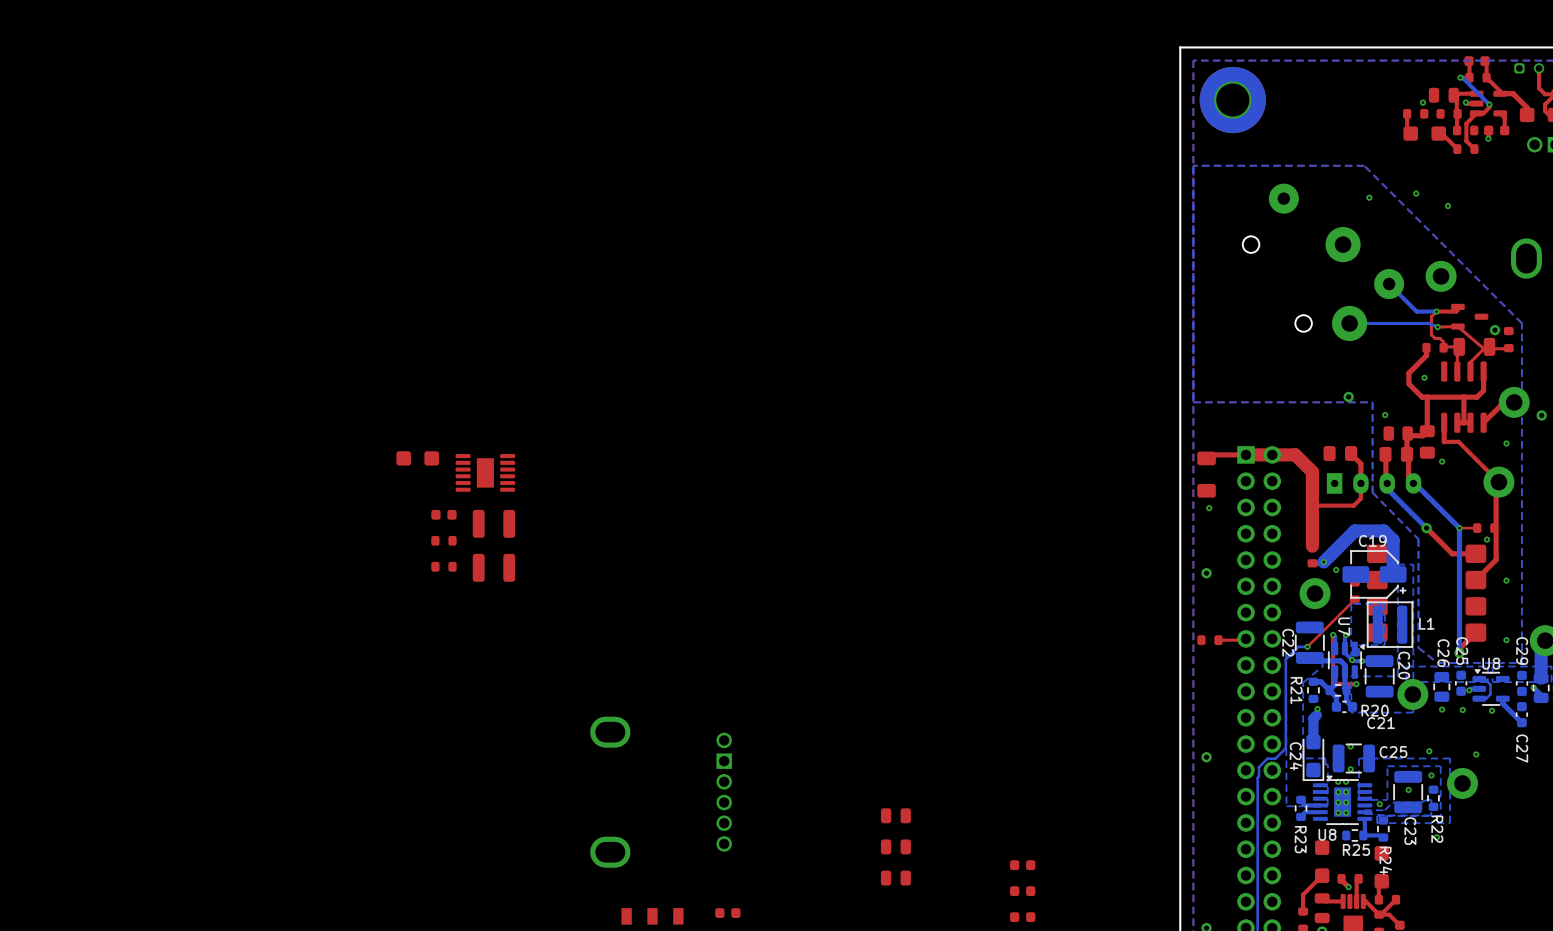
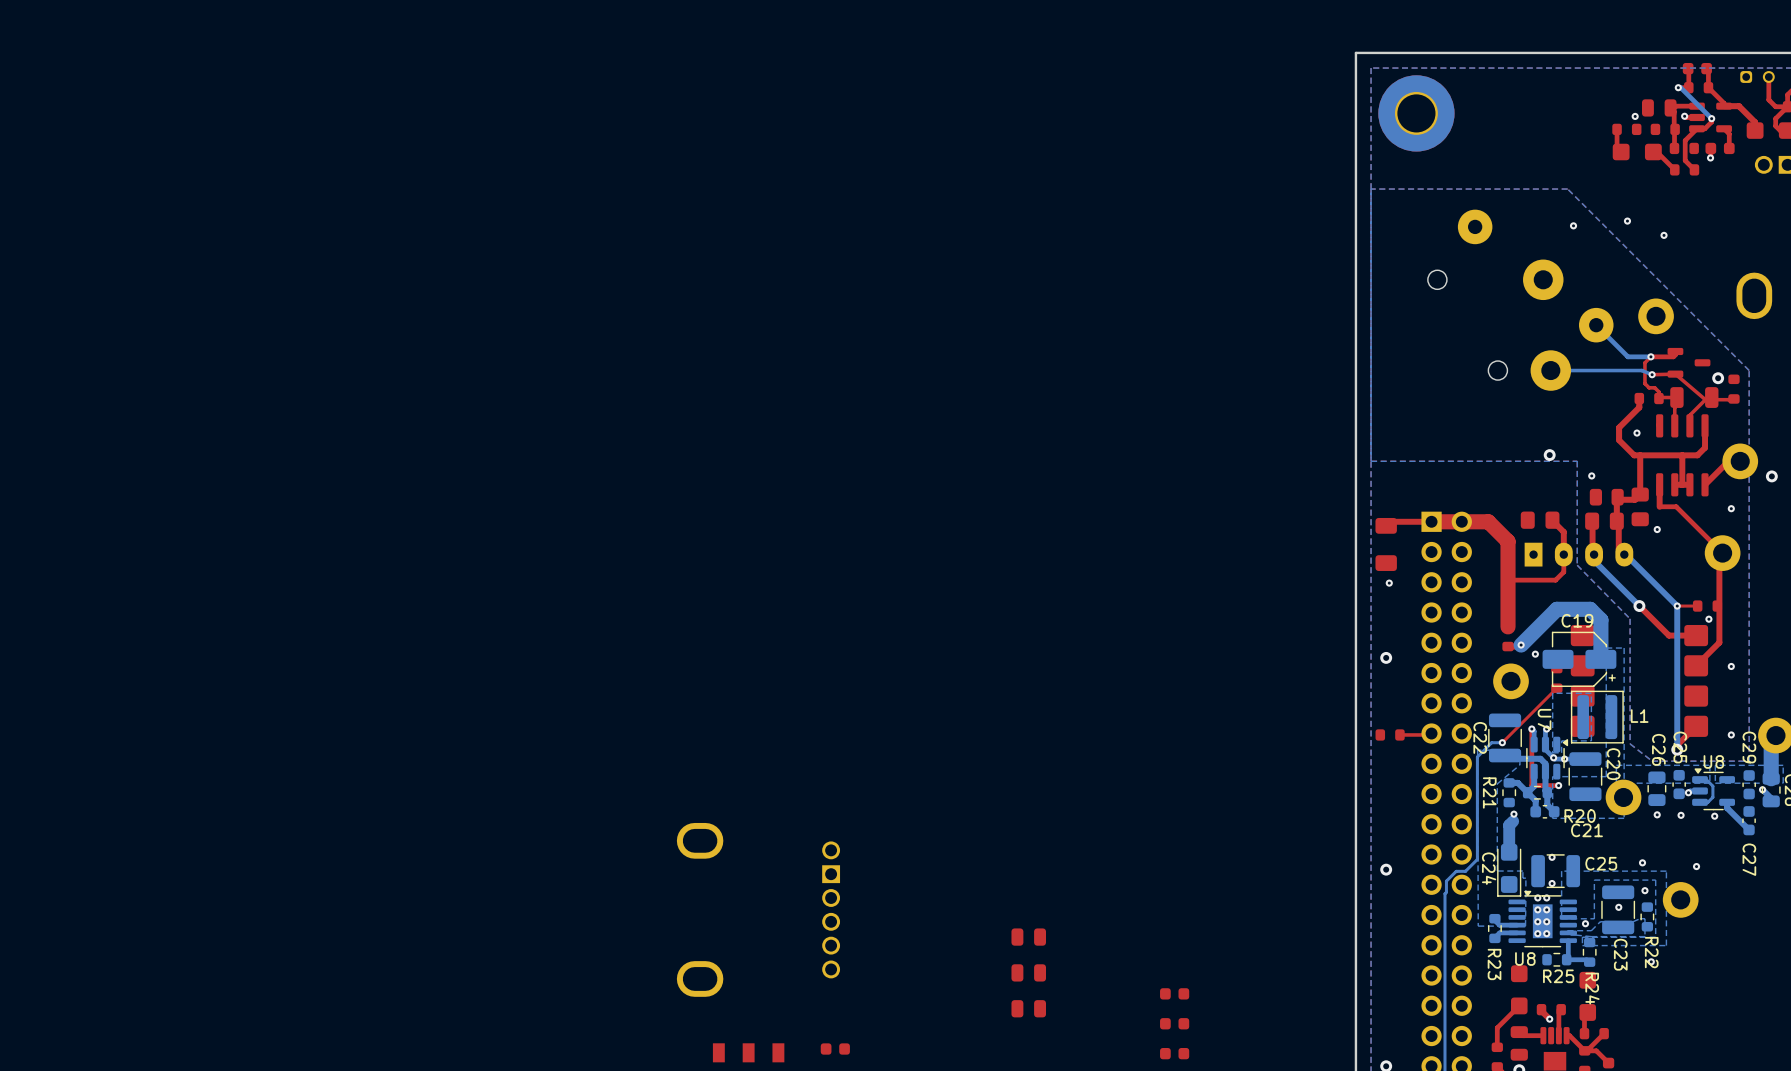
part: (417, 458) -> none
part: (485, 472) -> none
part: (443, 514) -> none
part: (493, 523) -> none
part: (443, 540) -> none
part: (443, 566) -> none
part: (493, 567) -> none

